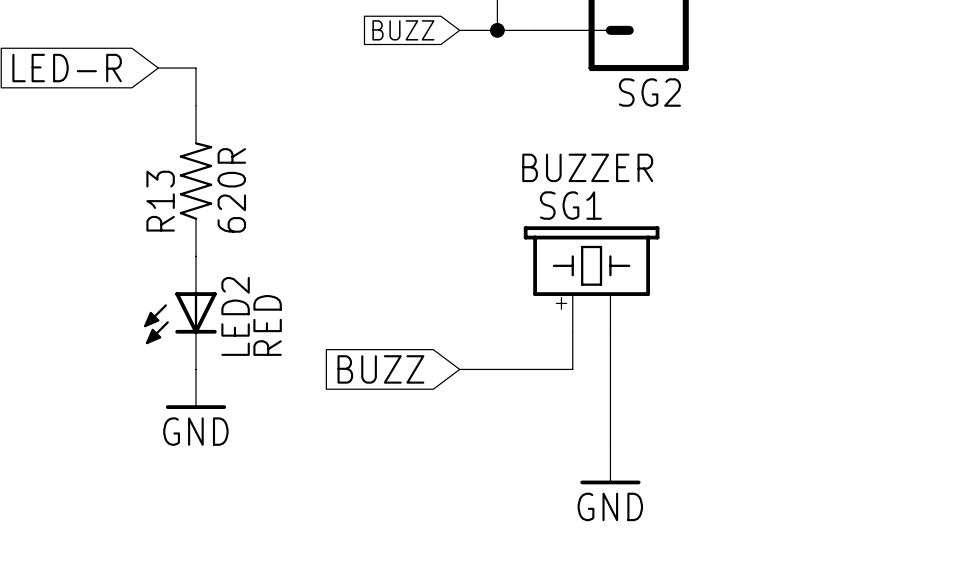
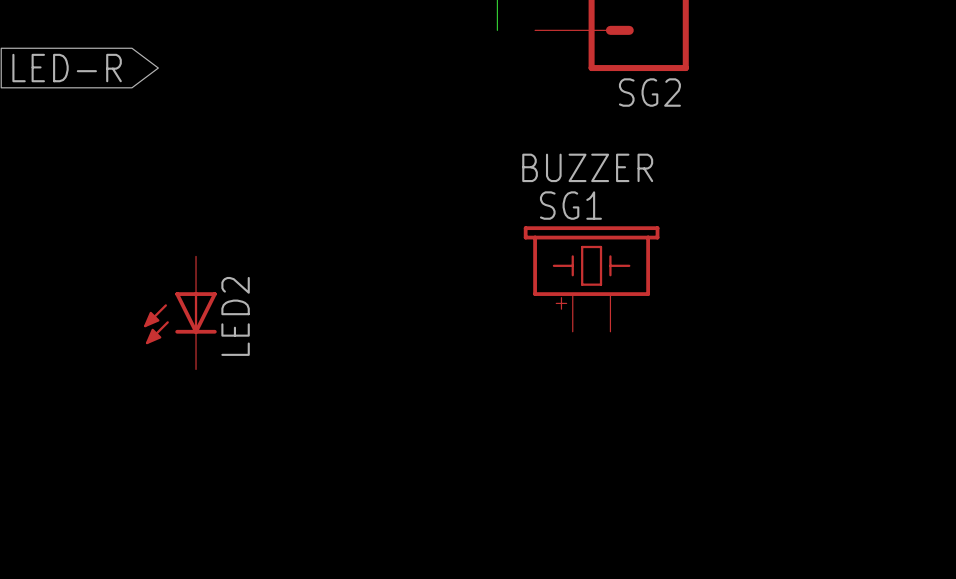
global label: BUZZ (403, 30) -> none
wire: (459, 30) (535, 30) -> none
junction: (497, 30) -> none
wire: (158, 68) (196, 68) (196, 105) -> none
R13: 620R (196, 181) -> none
LED2 value: RED (267, 325) -> none
wire: (572, 331) (572, 369) (459, 369) -> none
wire: (610, 331) (610, 444) -> none
global label: BUZZ (380, 369) -> none
power symbol: GND (196, 389) -> none
power symbol: GND (610, 464) -> none

